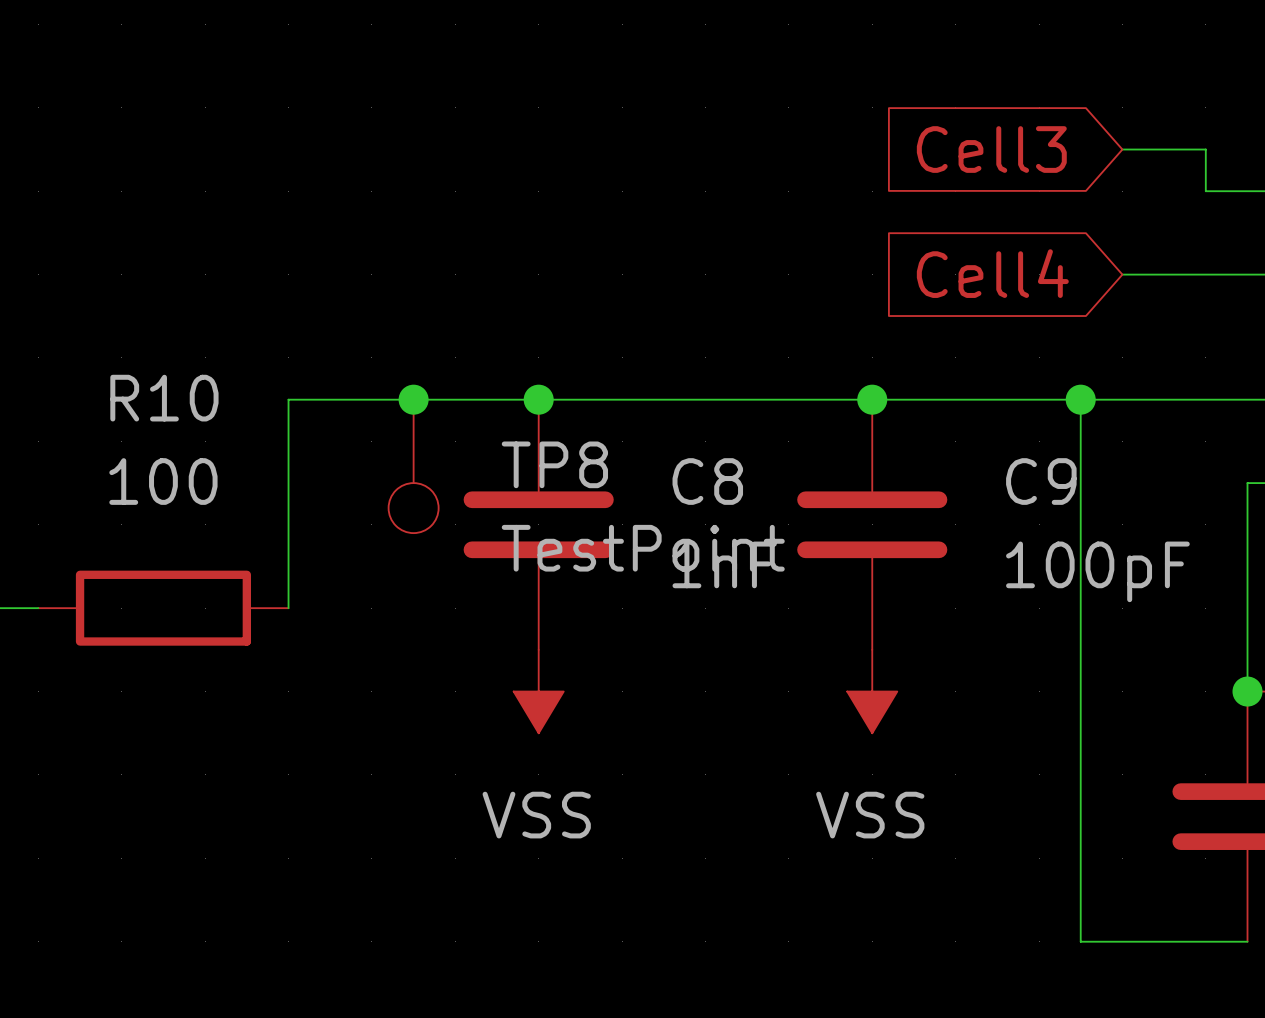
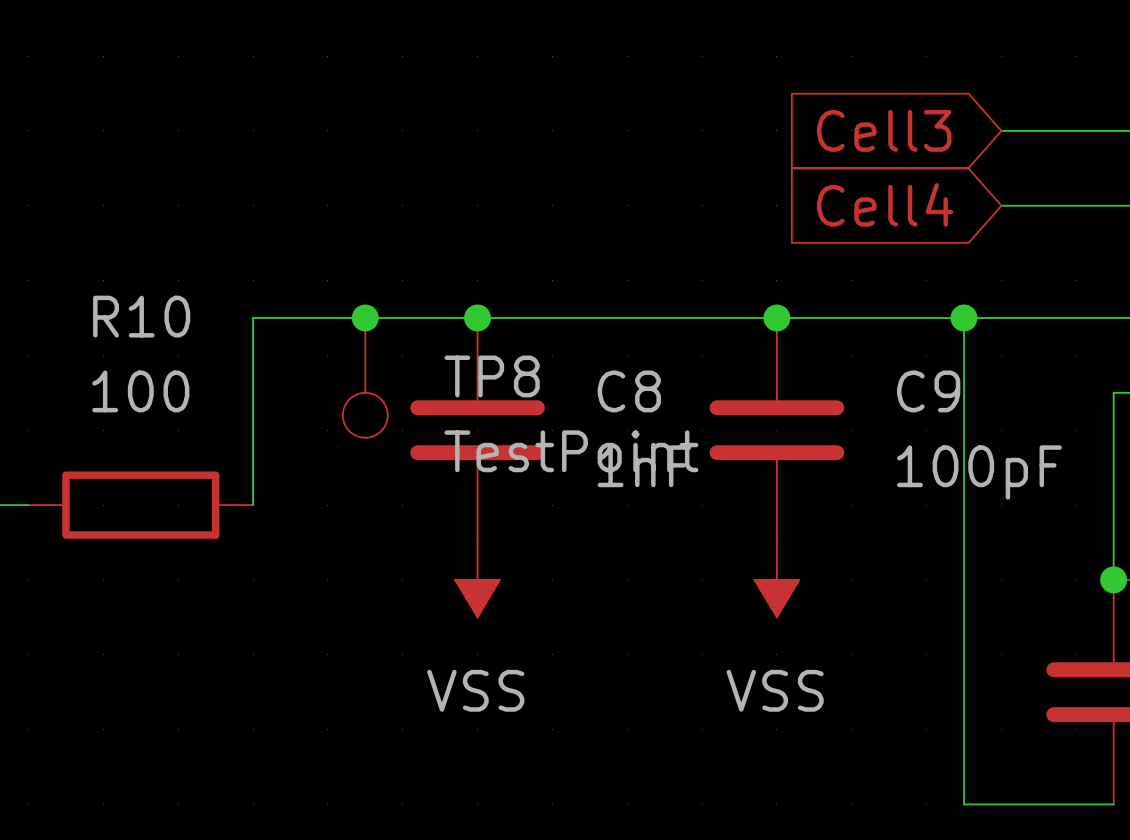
global label position: Cell3 (991, 149) -> Cell3 (884, 130)
wire: (1122, 149) (1205, 149) (1205, 191) -> (1001, 130) (1076, 130)

